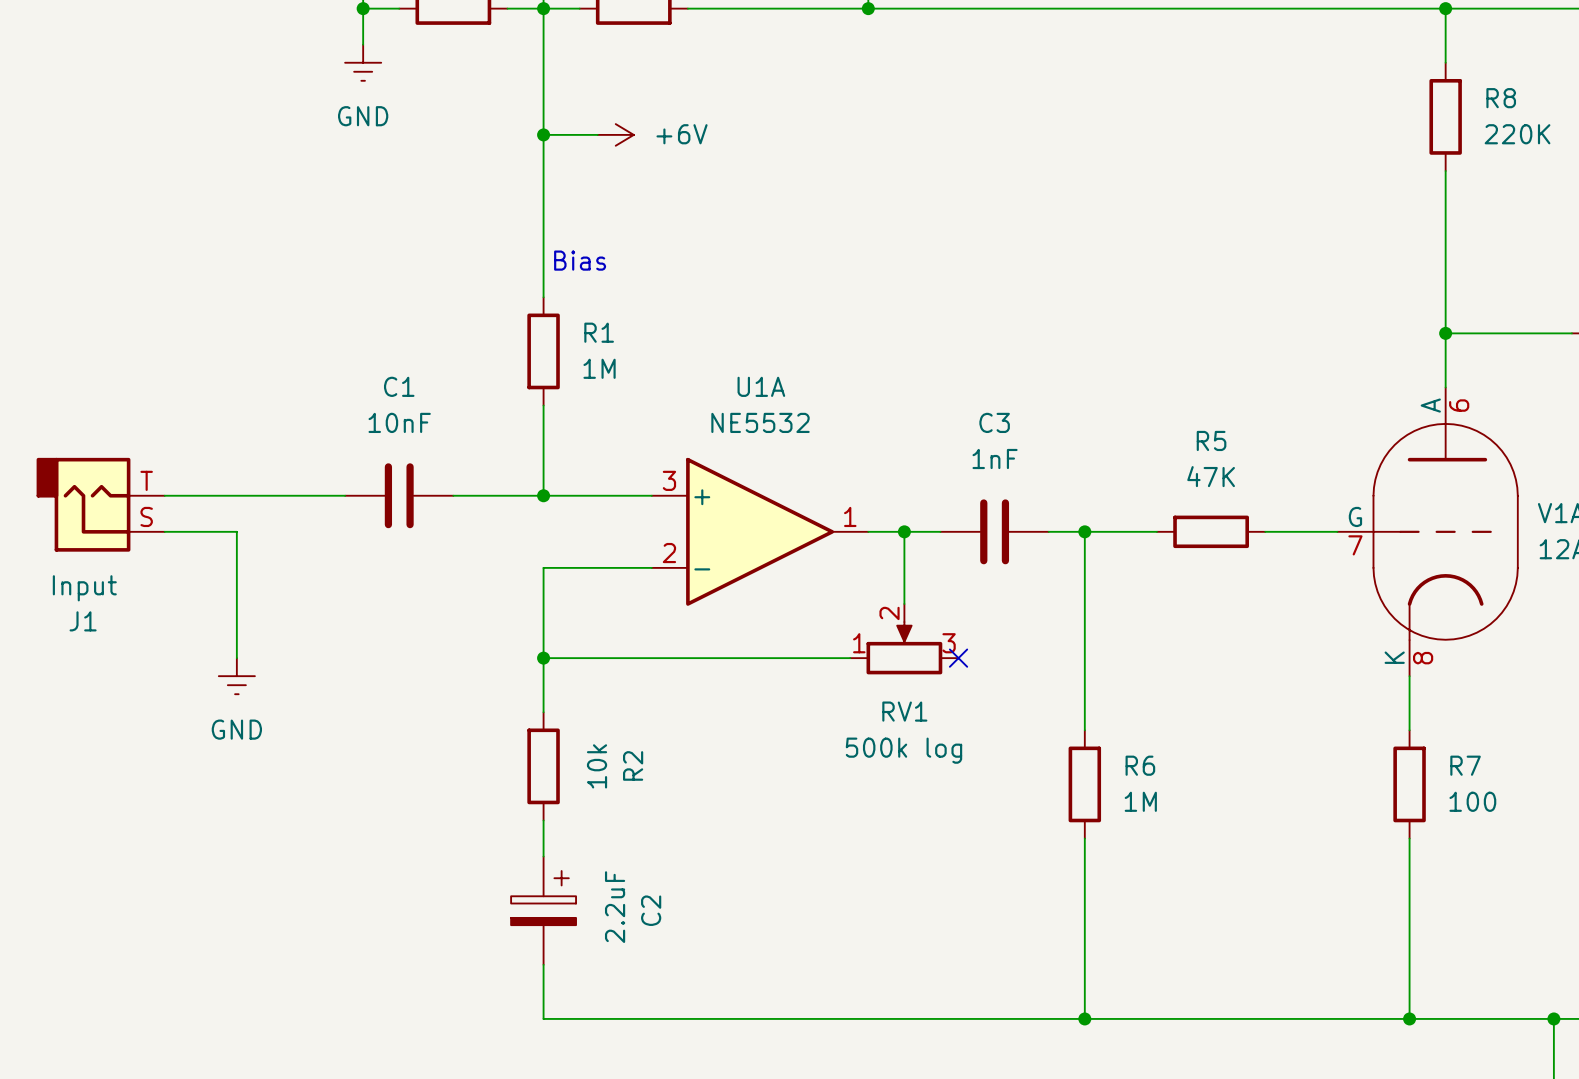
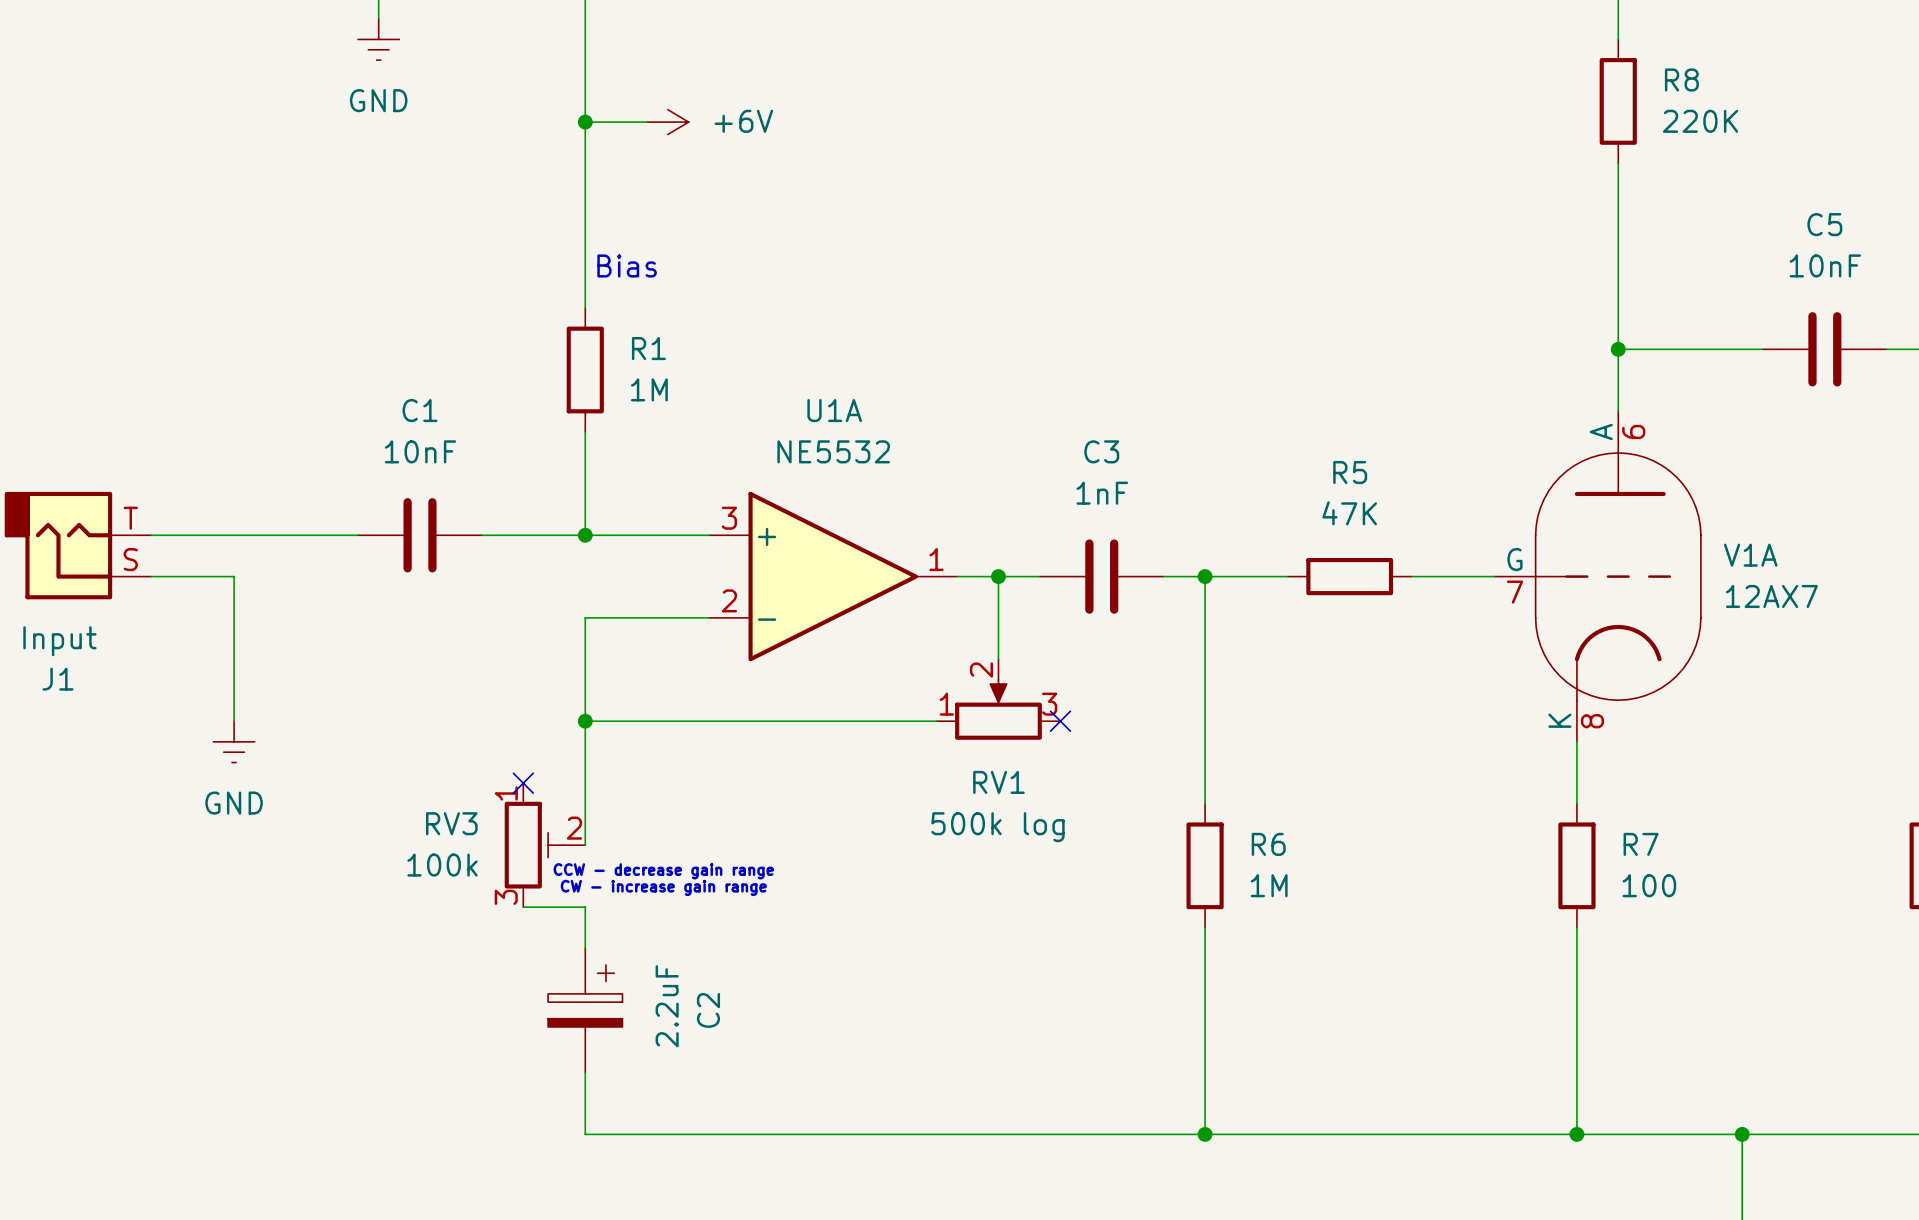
no-connect mark: none -> (523, 783)
wire: none -> (585, 783) (585, 845)
RV3: none -> 100k (545, 845)
R2: 10k (543, 766) -> none
text: none -> CCW - decrease gain range (663, 871)
text: none -> CW - increase gain range (663, 887)
wire: none -> (523, 907) (585, 907)

